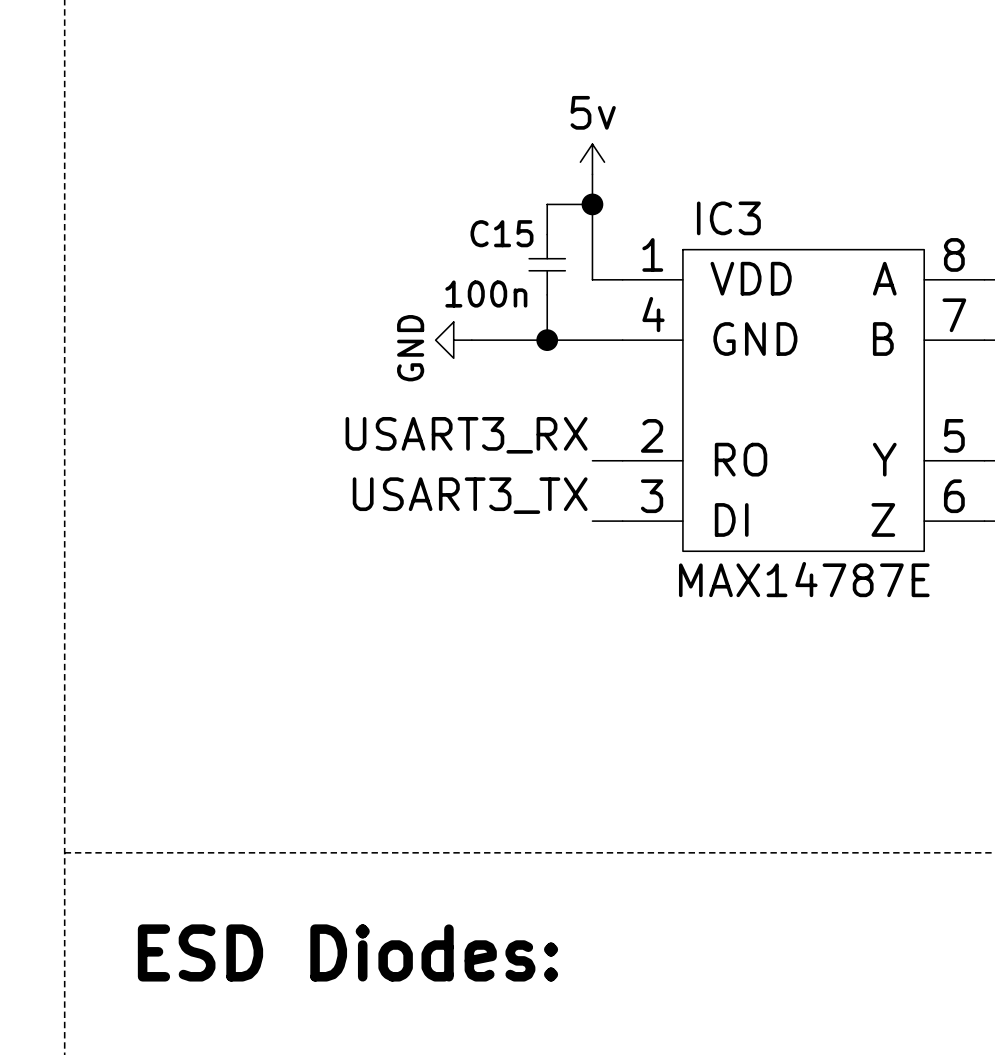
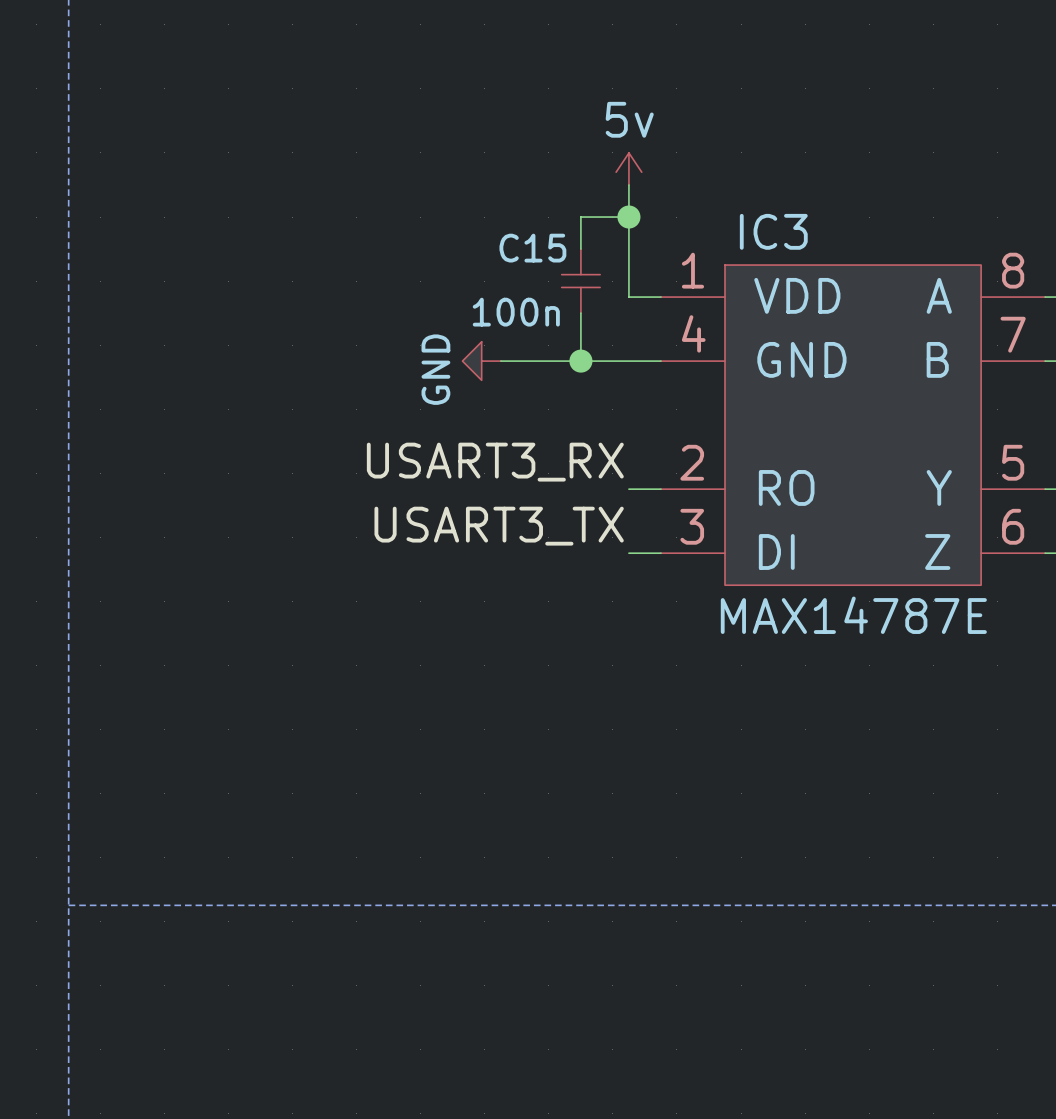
text: ESD Diodes: (347, 952) -> none

